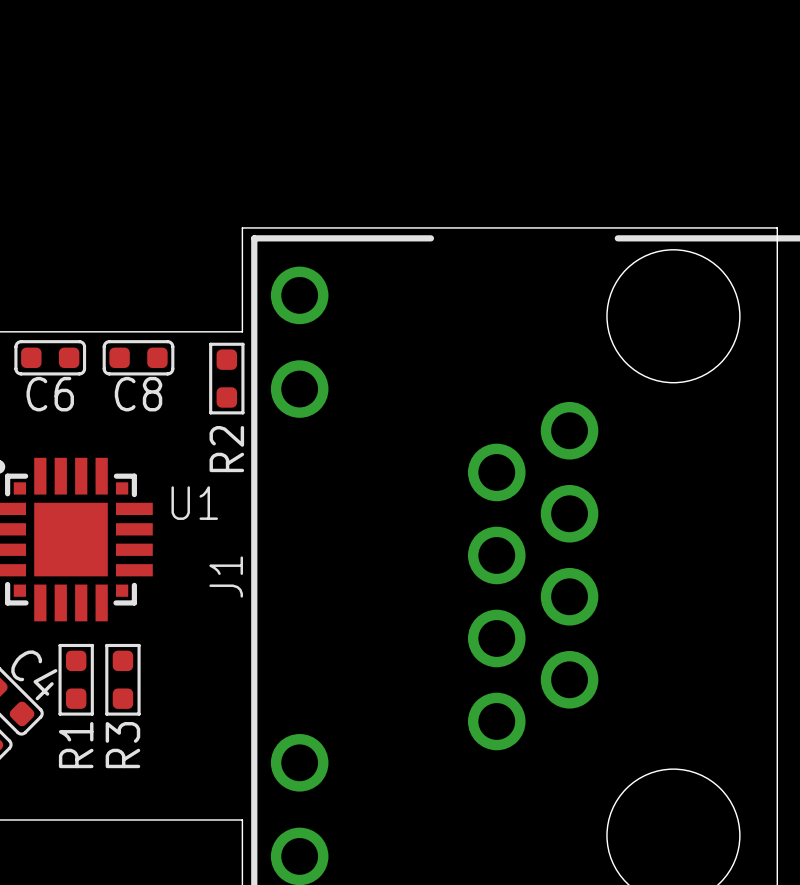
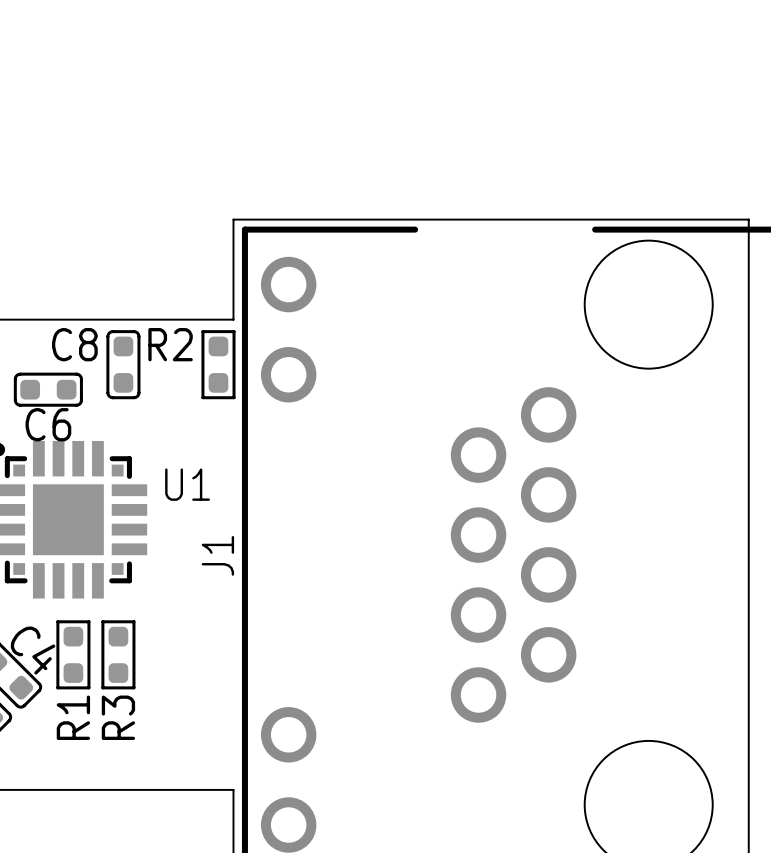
C6 position: (50, 357) -> (48, 389)
C8 rotation: 0° (138, 357) -> 90° clockwise (123, 364)
R2 name rotation: 0° (226, 449) -> 90° clockwise (170, 344)
R2 name position: R2 (226, 449) -> R2 (170, 344)

